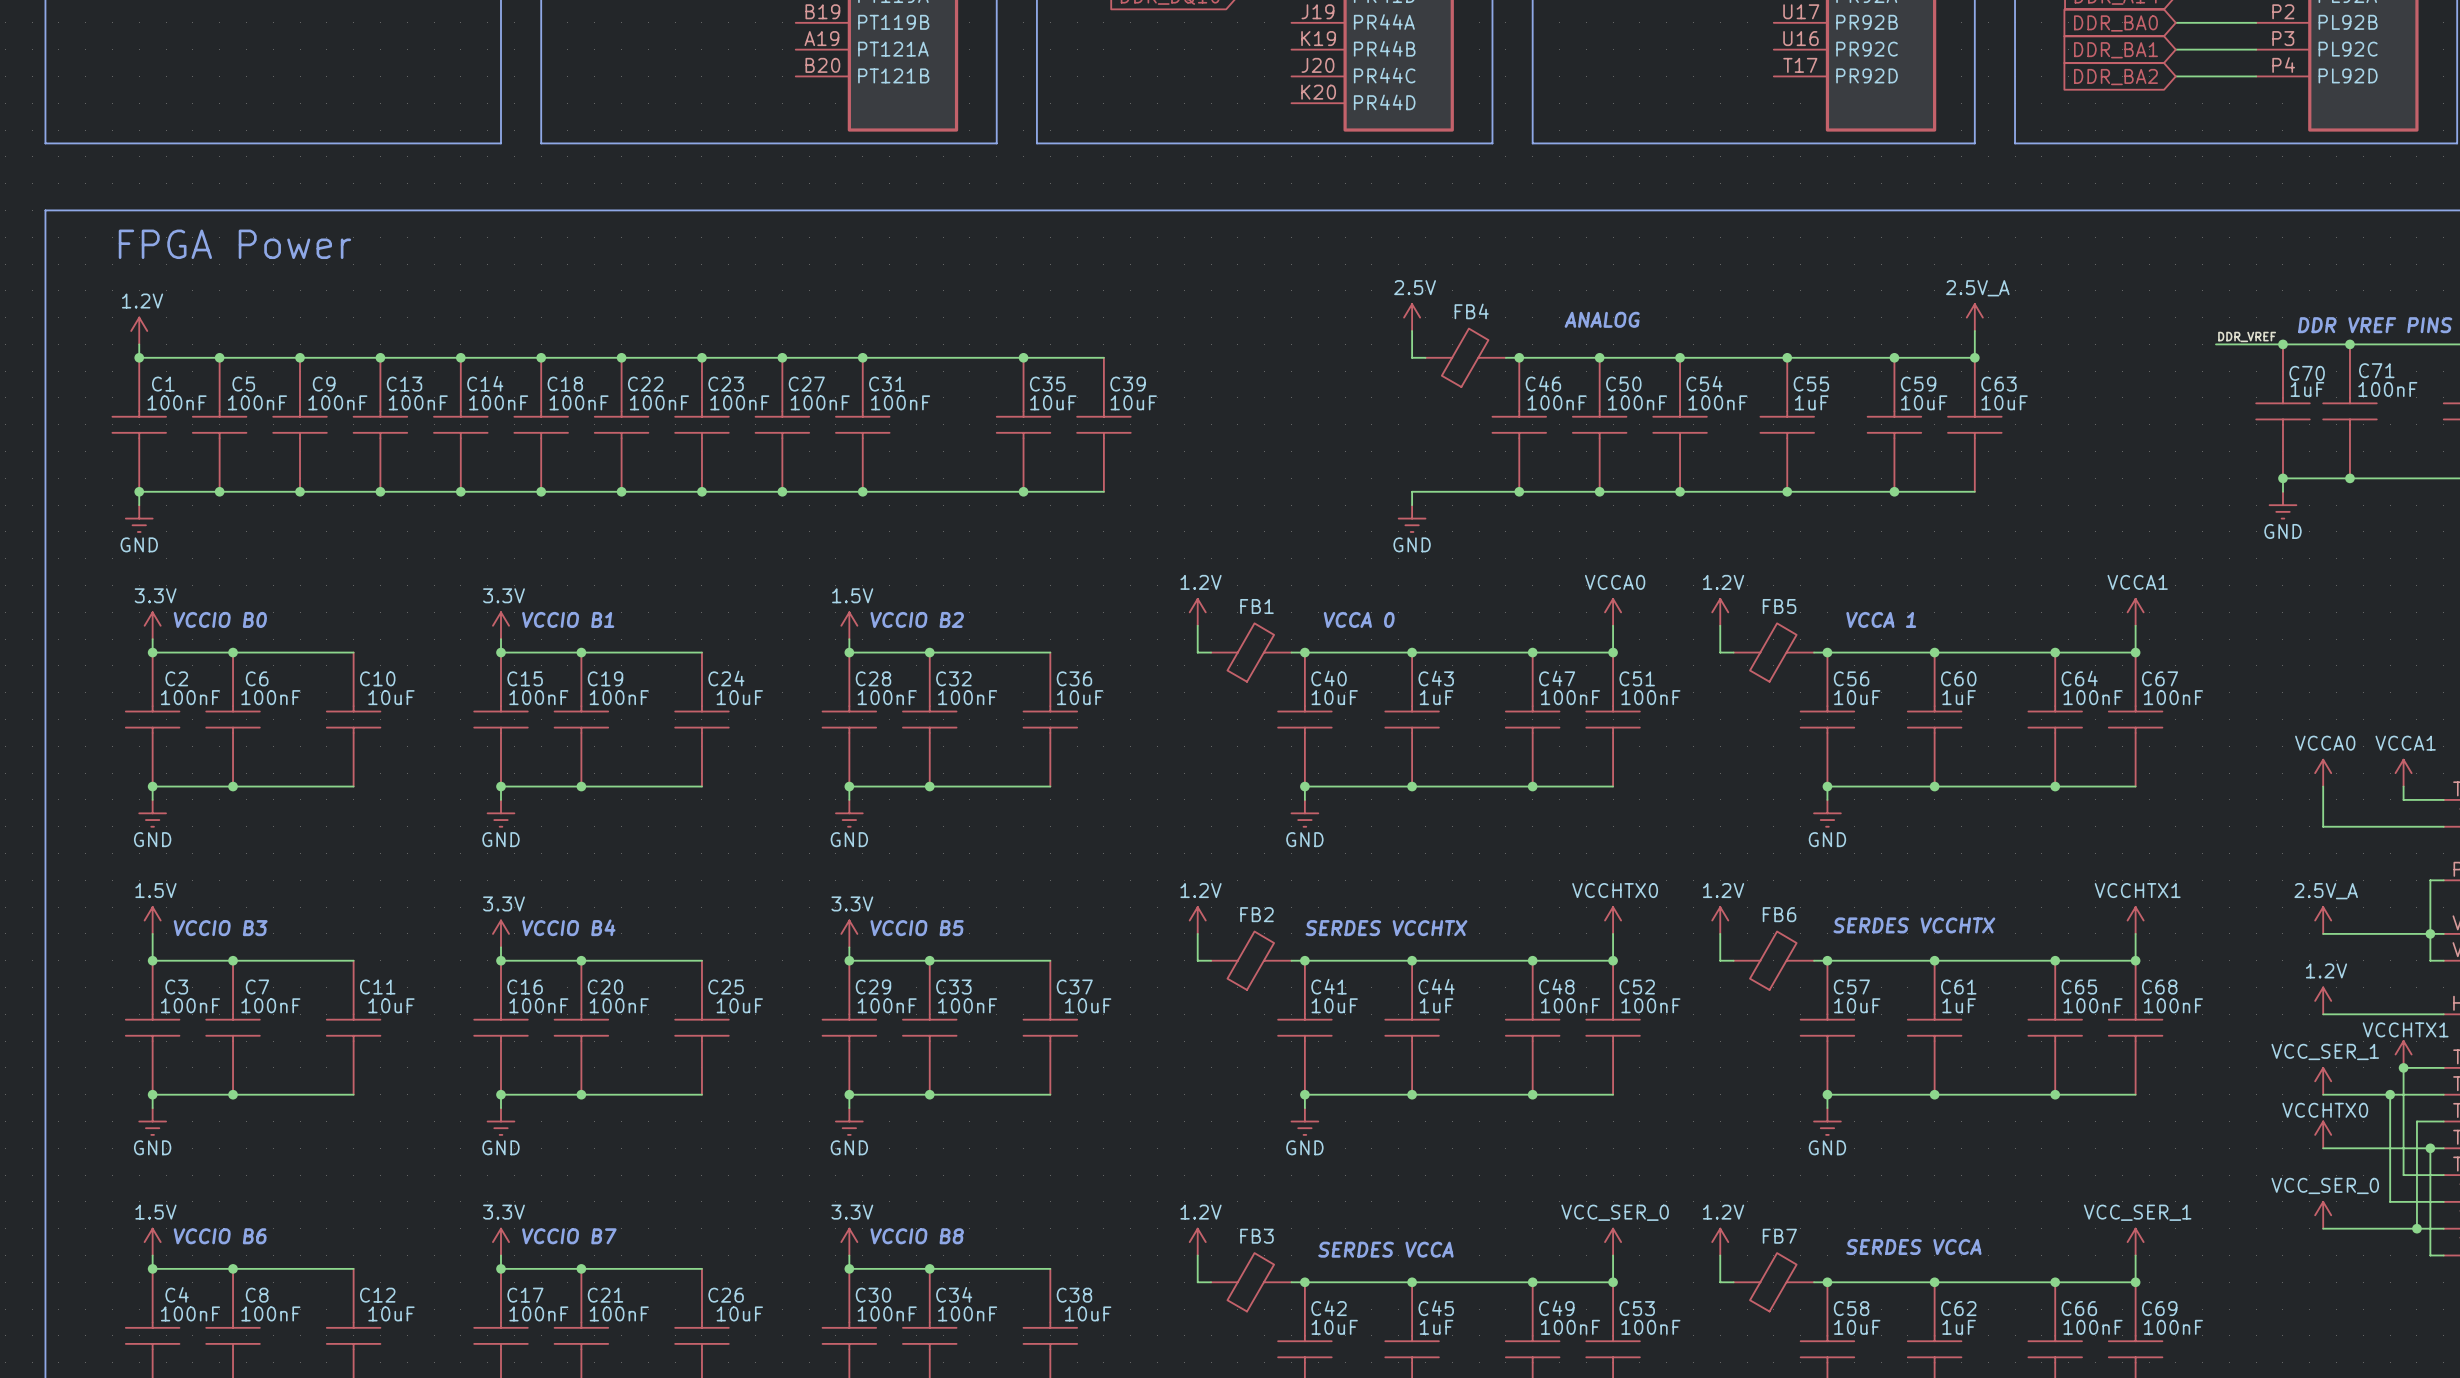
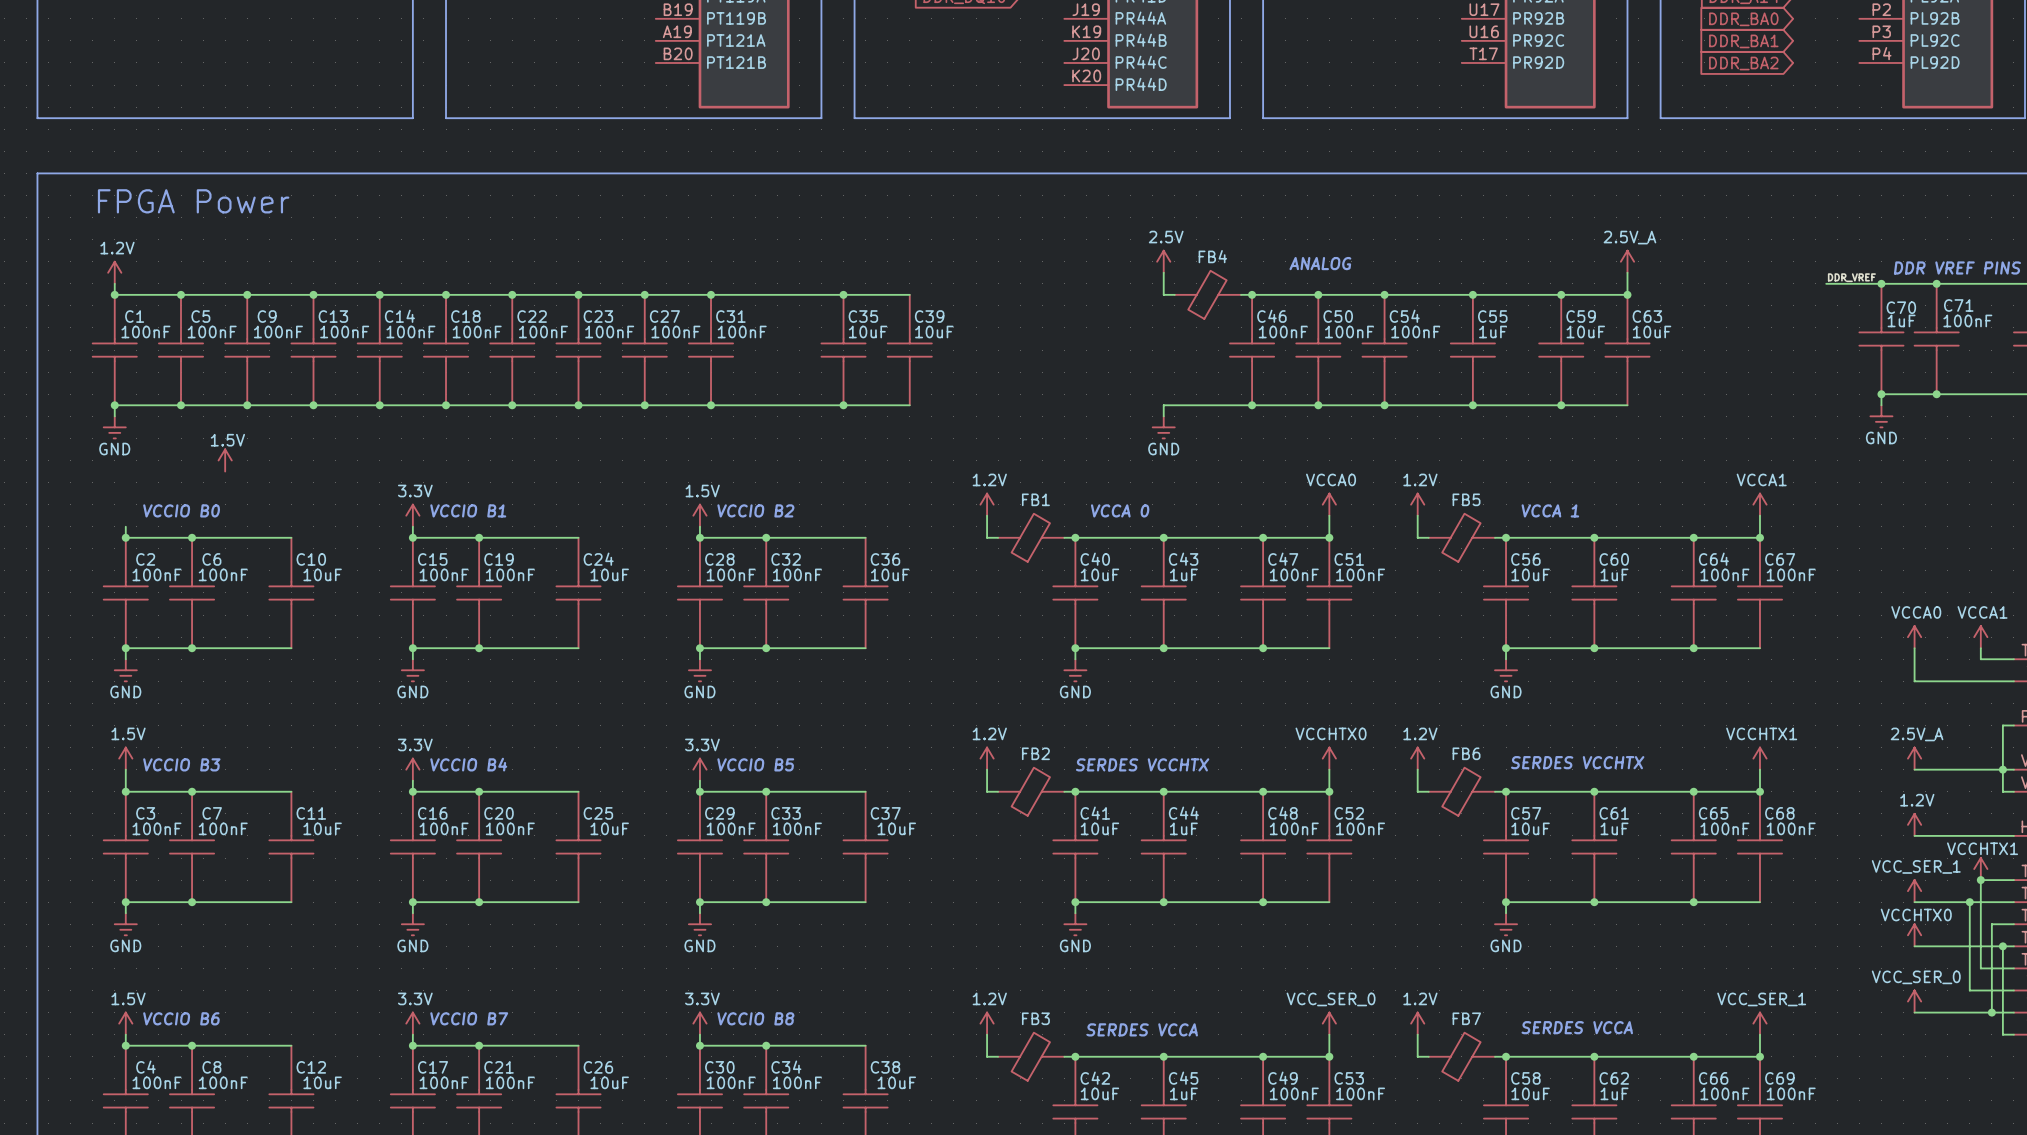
wire: (2175, 22) (2256, 22) -> none
wire: (2175, 49) (2256, 49) -> none
wire: (2175, 76) (2256, 76) -> none
power symbol: none -> 1.5V (225, 460)
power symbol: 3.3V (152, 625) -> none

